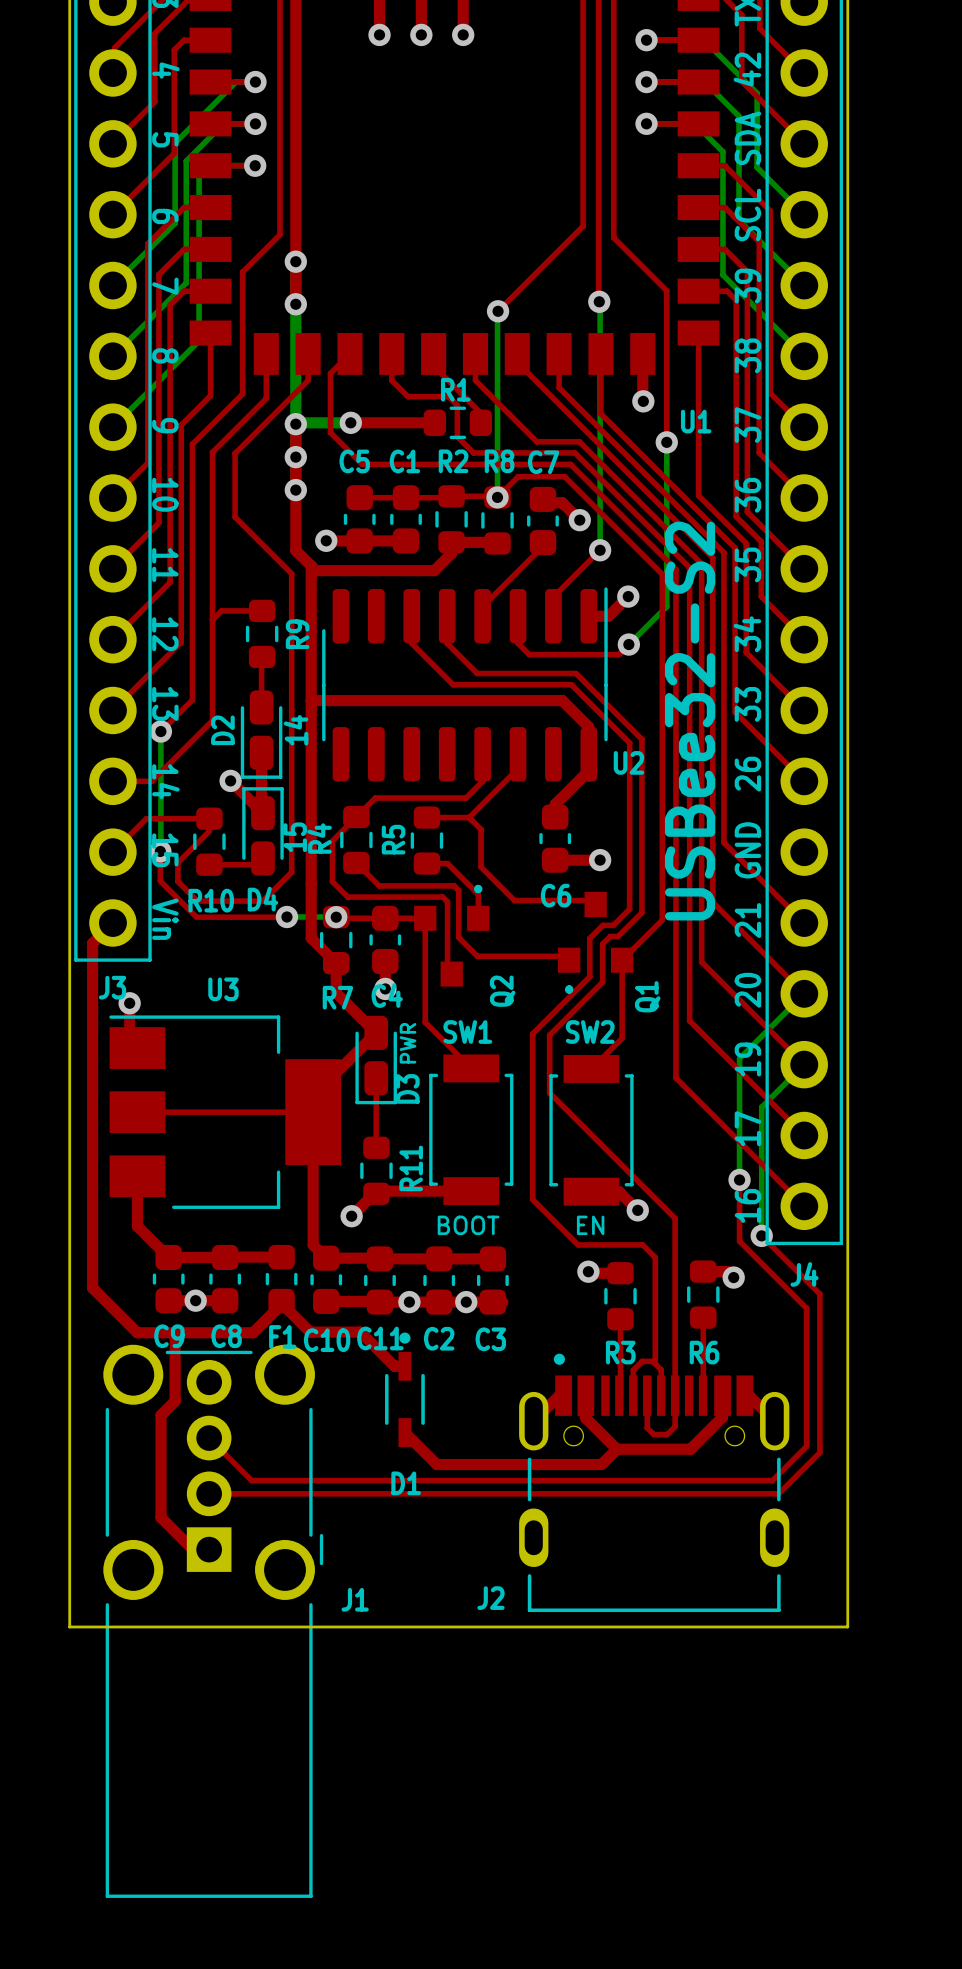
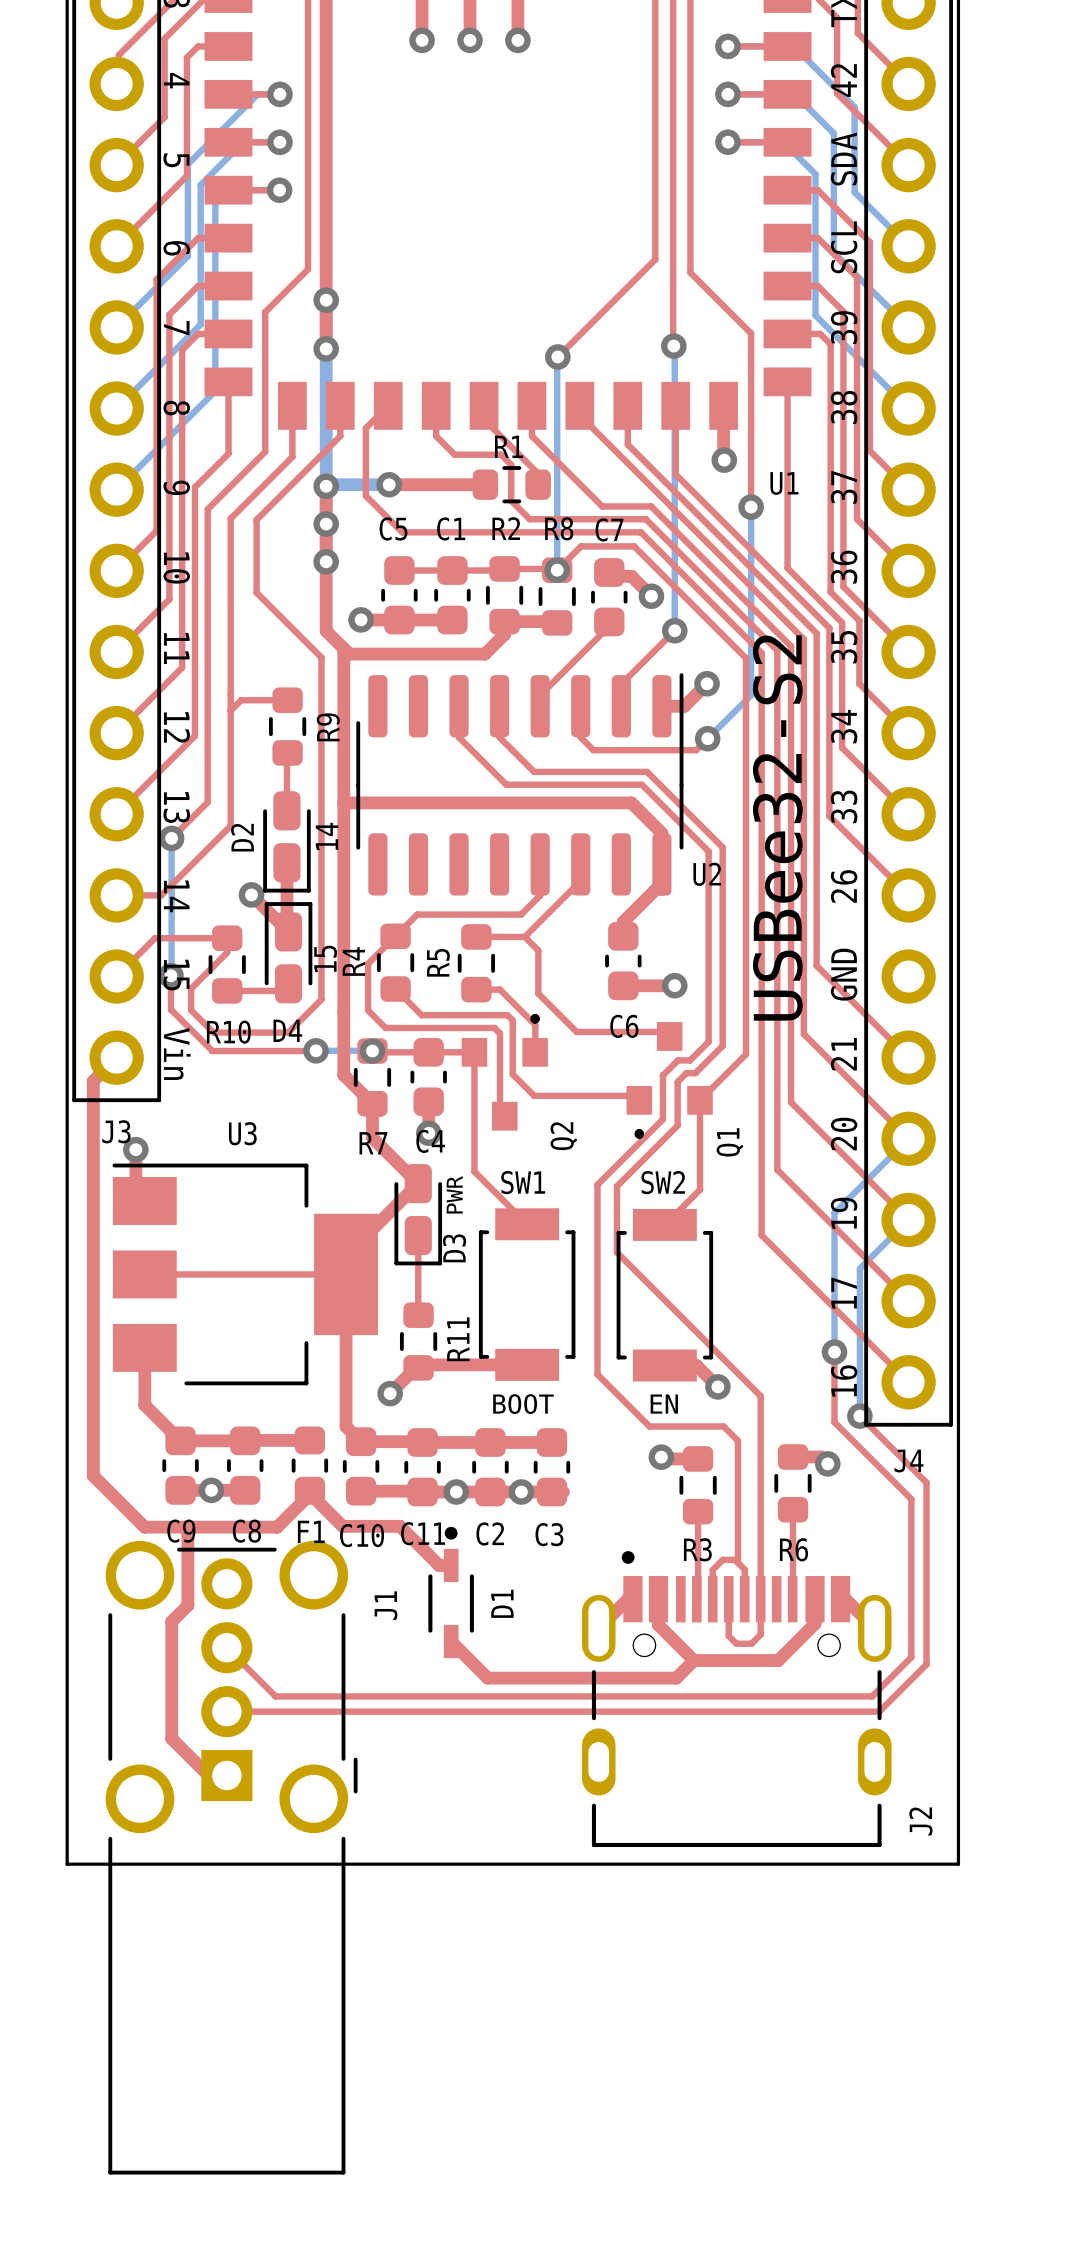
D1 name rotation: 0° (406, 1483) -> 90° counterclockwise (502, 1603)
D1 name position: D1 (406, 1483) -> D1 (502, 1603)
J2 name rotation: 0° (490, 1598) -> 90° counterclockwise (920, 1821)
J2 name position: J2 (490, 1598) -> J2 (920, 1821)
J1 name rotation: 0° (355, 1599) -> 90° counterclockwise (386, 1605)
J1 name position: J1 (355, 1599) -> J1 (386, 1605)

